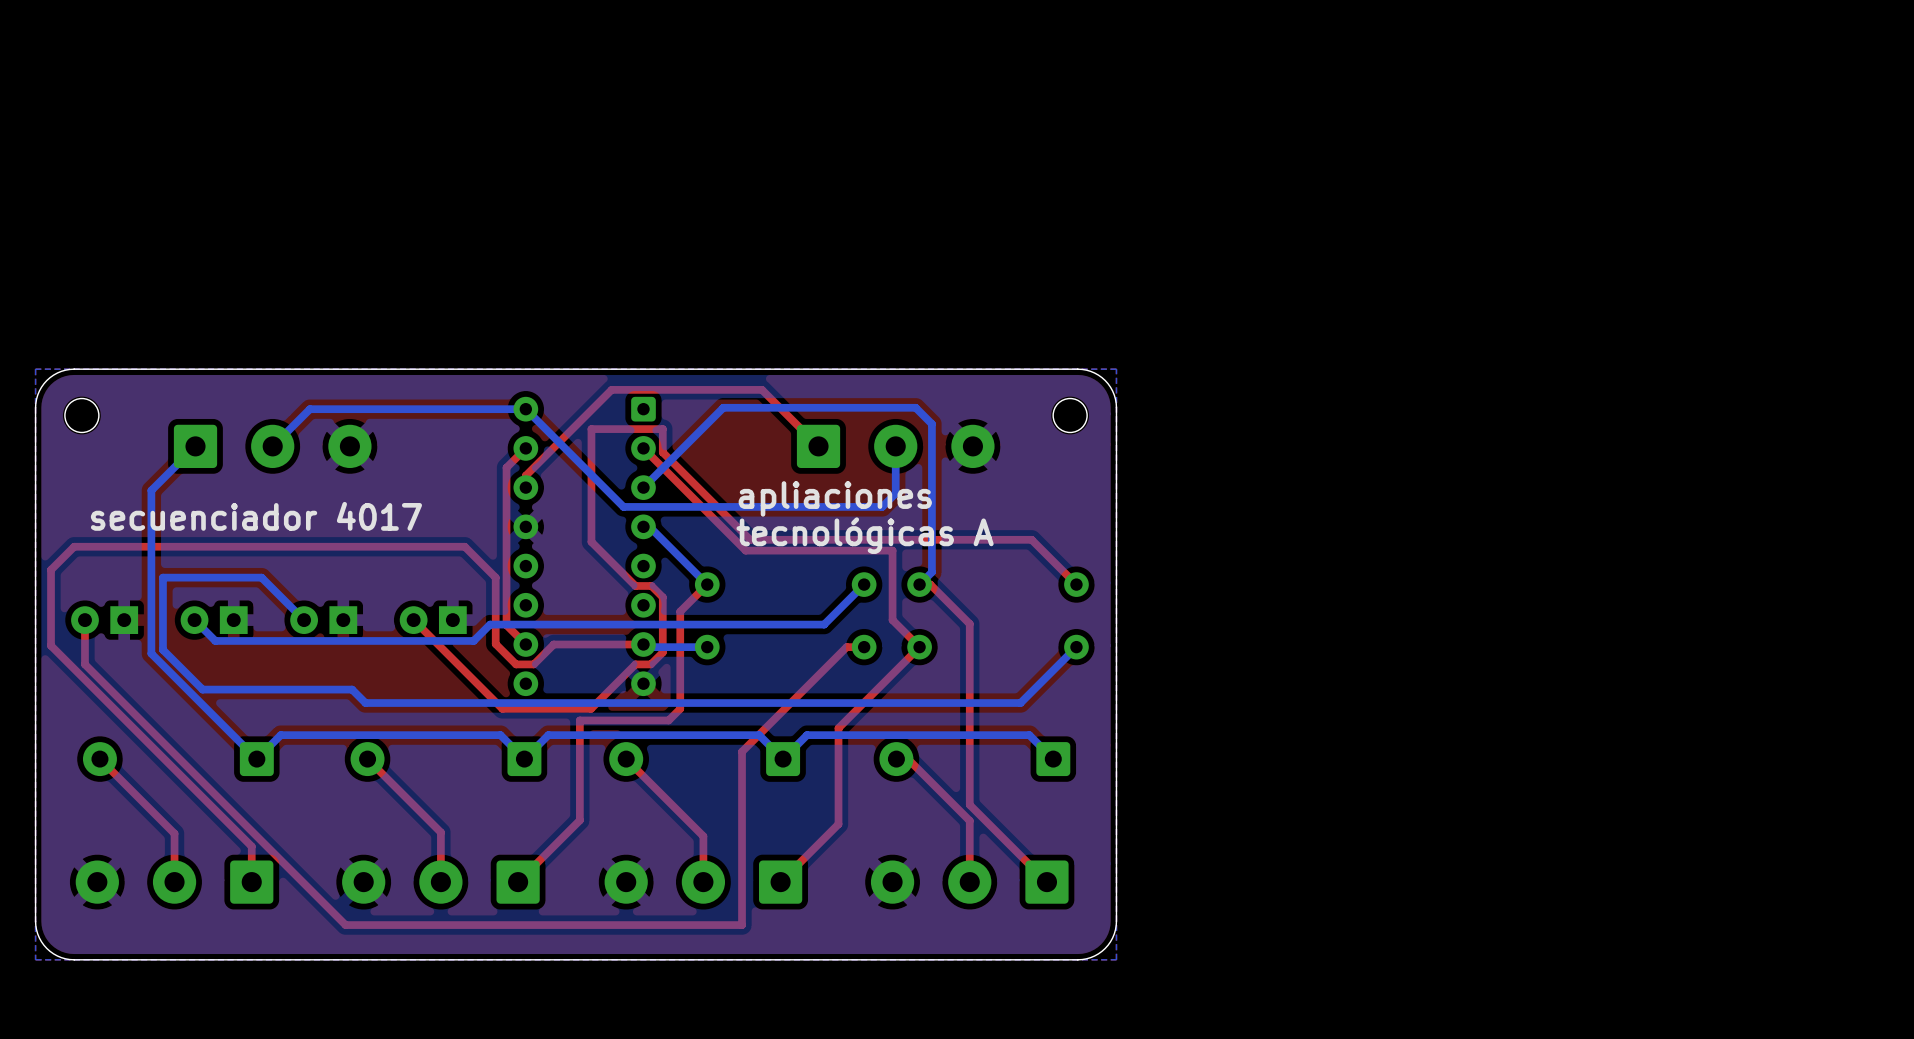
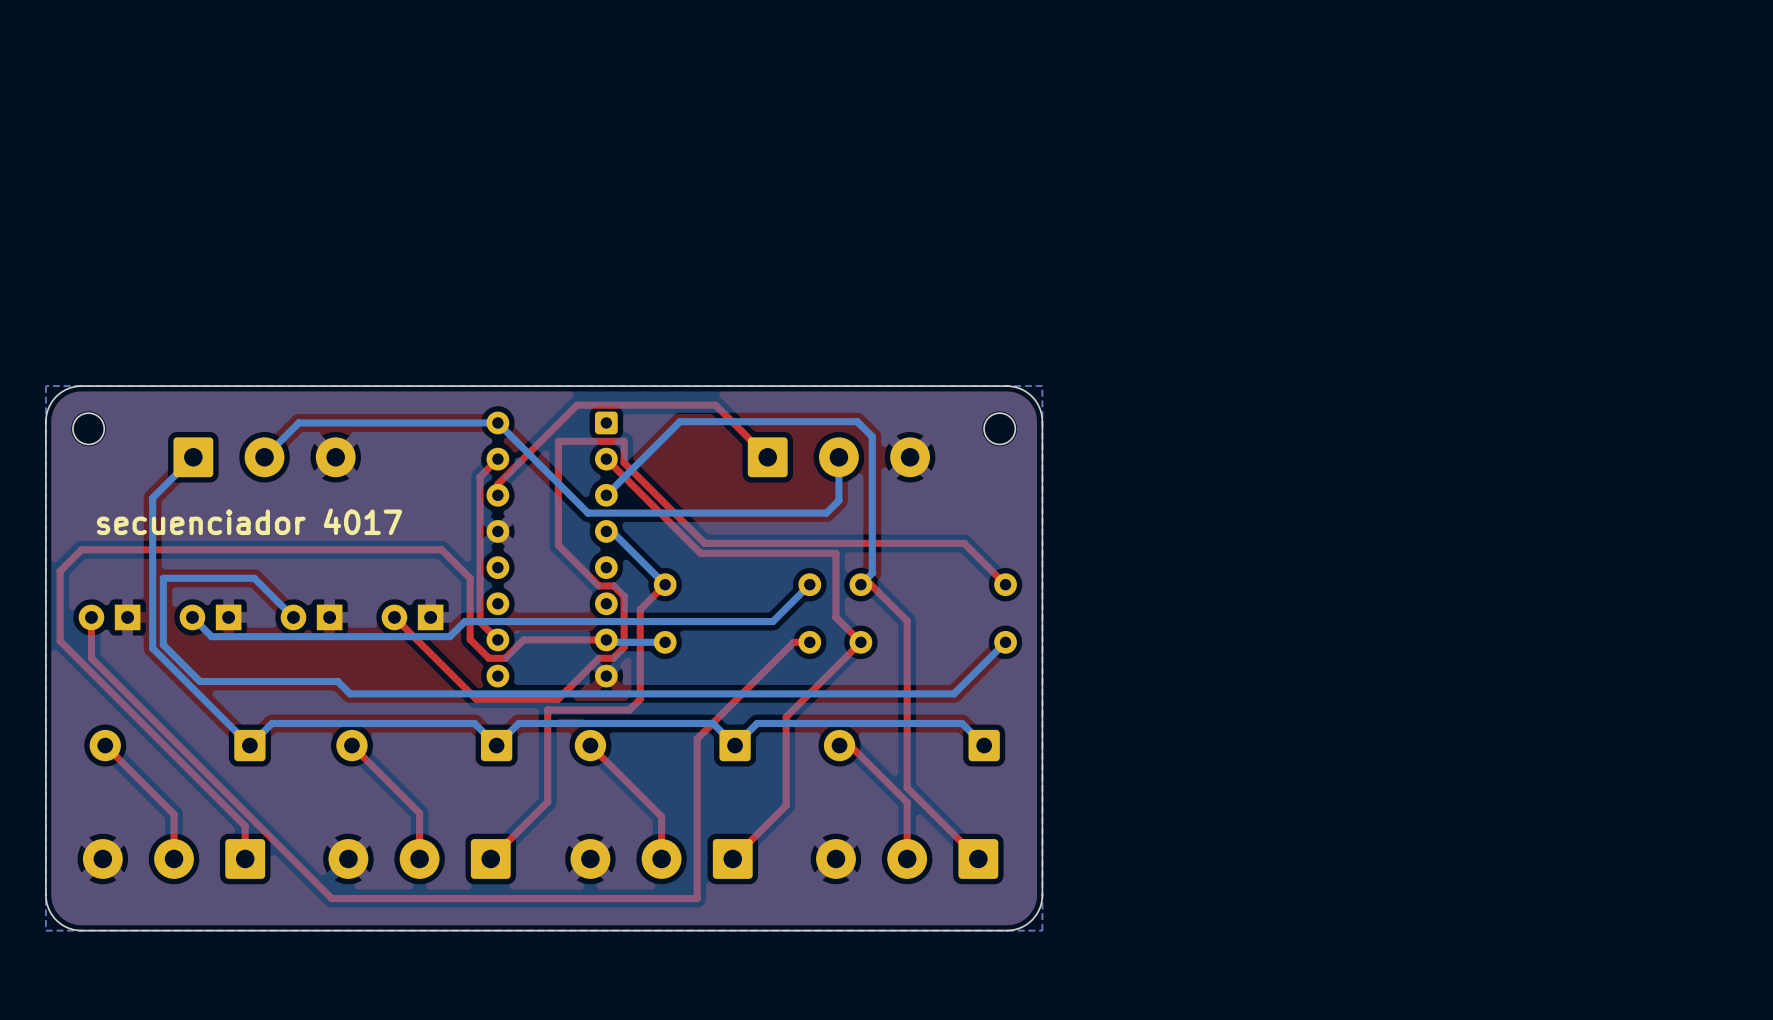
text: apliaciones (835, 498) -> none
text: tecnológicas A (865, 535) -> none

